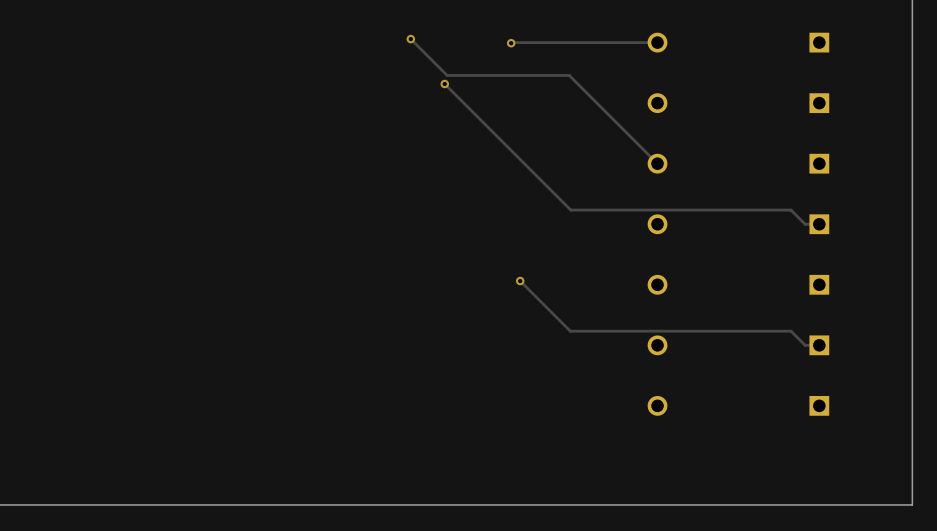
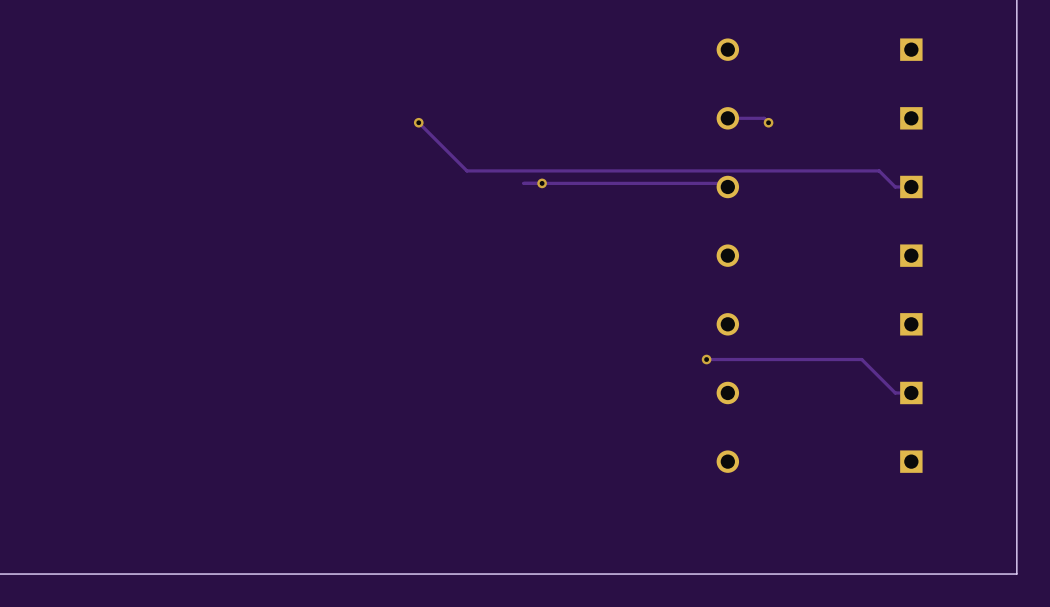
track: (410, 39) (447, 75) (569, 75) (654, 160) -> (523, 183) (724, 183)
via: (410, 39) -> none
track: (657, 42) (511, 43) -> none
via: (511, 43) -> none
track: (444, 83) (570, 210) (791, 210) (805, 224) (819, 224) -> none
via: (444, 83) -> none
track: none -> (727, 118) (764, 118) (768, 122)
track: none -> (418, 122) (466, 170) (879, 170) (895, 186) (911, 186)
via: none -> (418, 122)
via: none -> (768, 122)
via: none -> (542, 183)
track: (520, 281) (570, 331) (791, 331) -> (706, 359) (861, 359) (879, 376)
via: (520, 281) -> none
via: none -> (706, 359)

